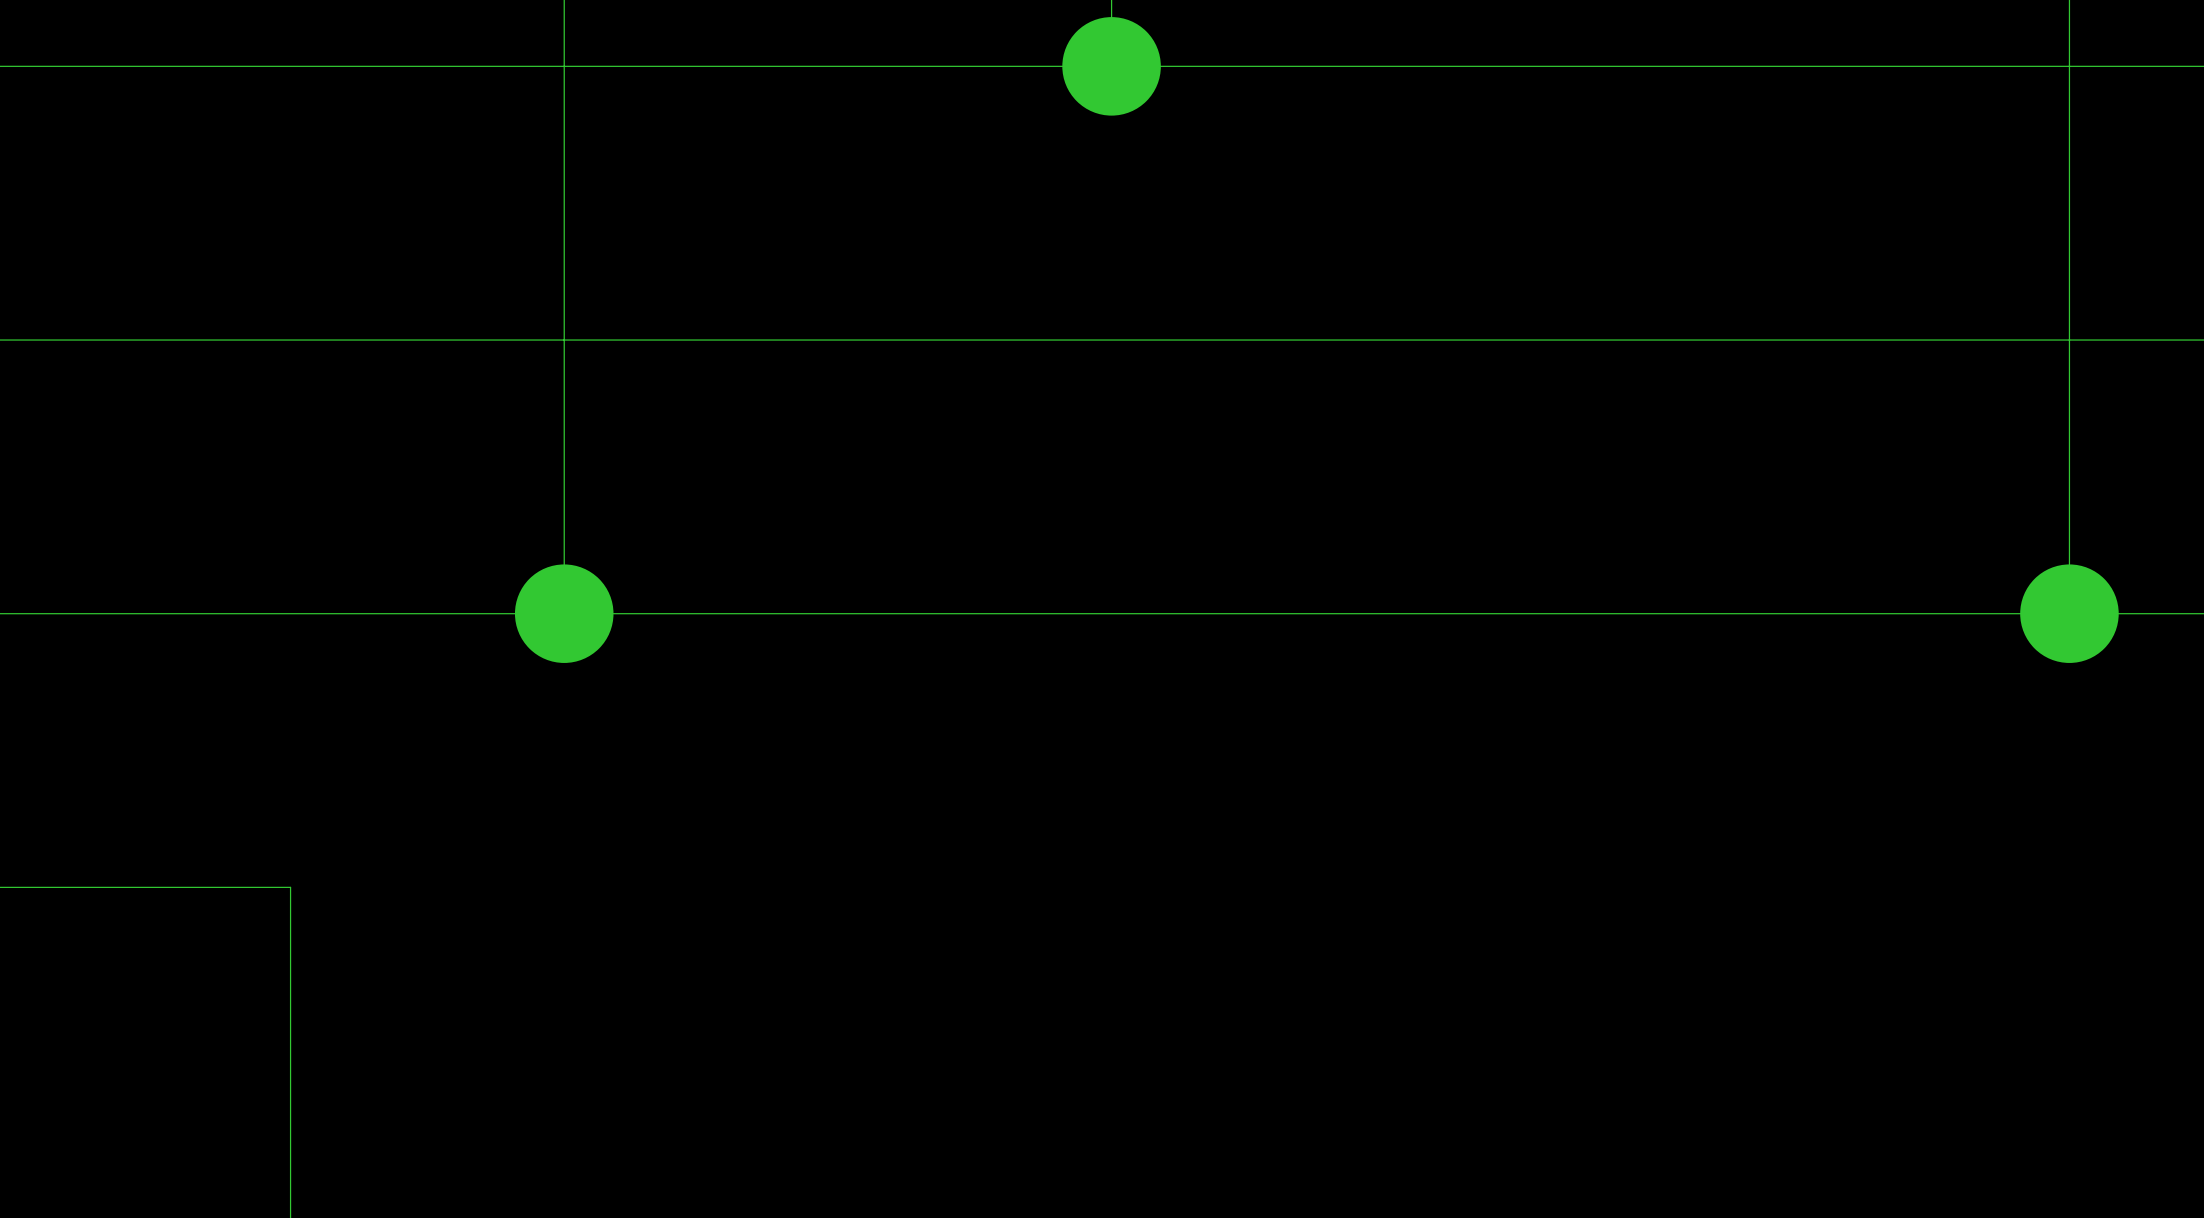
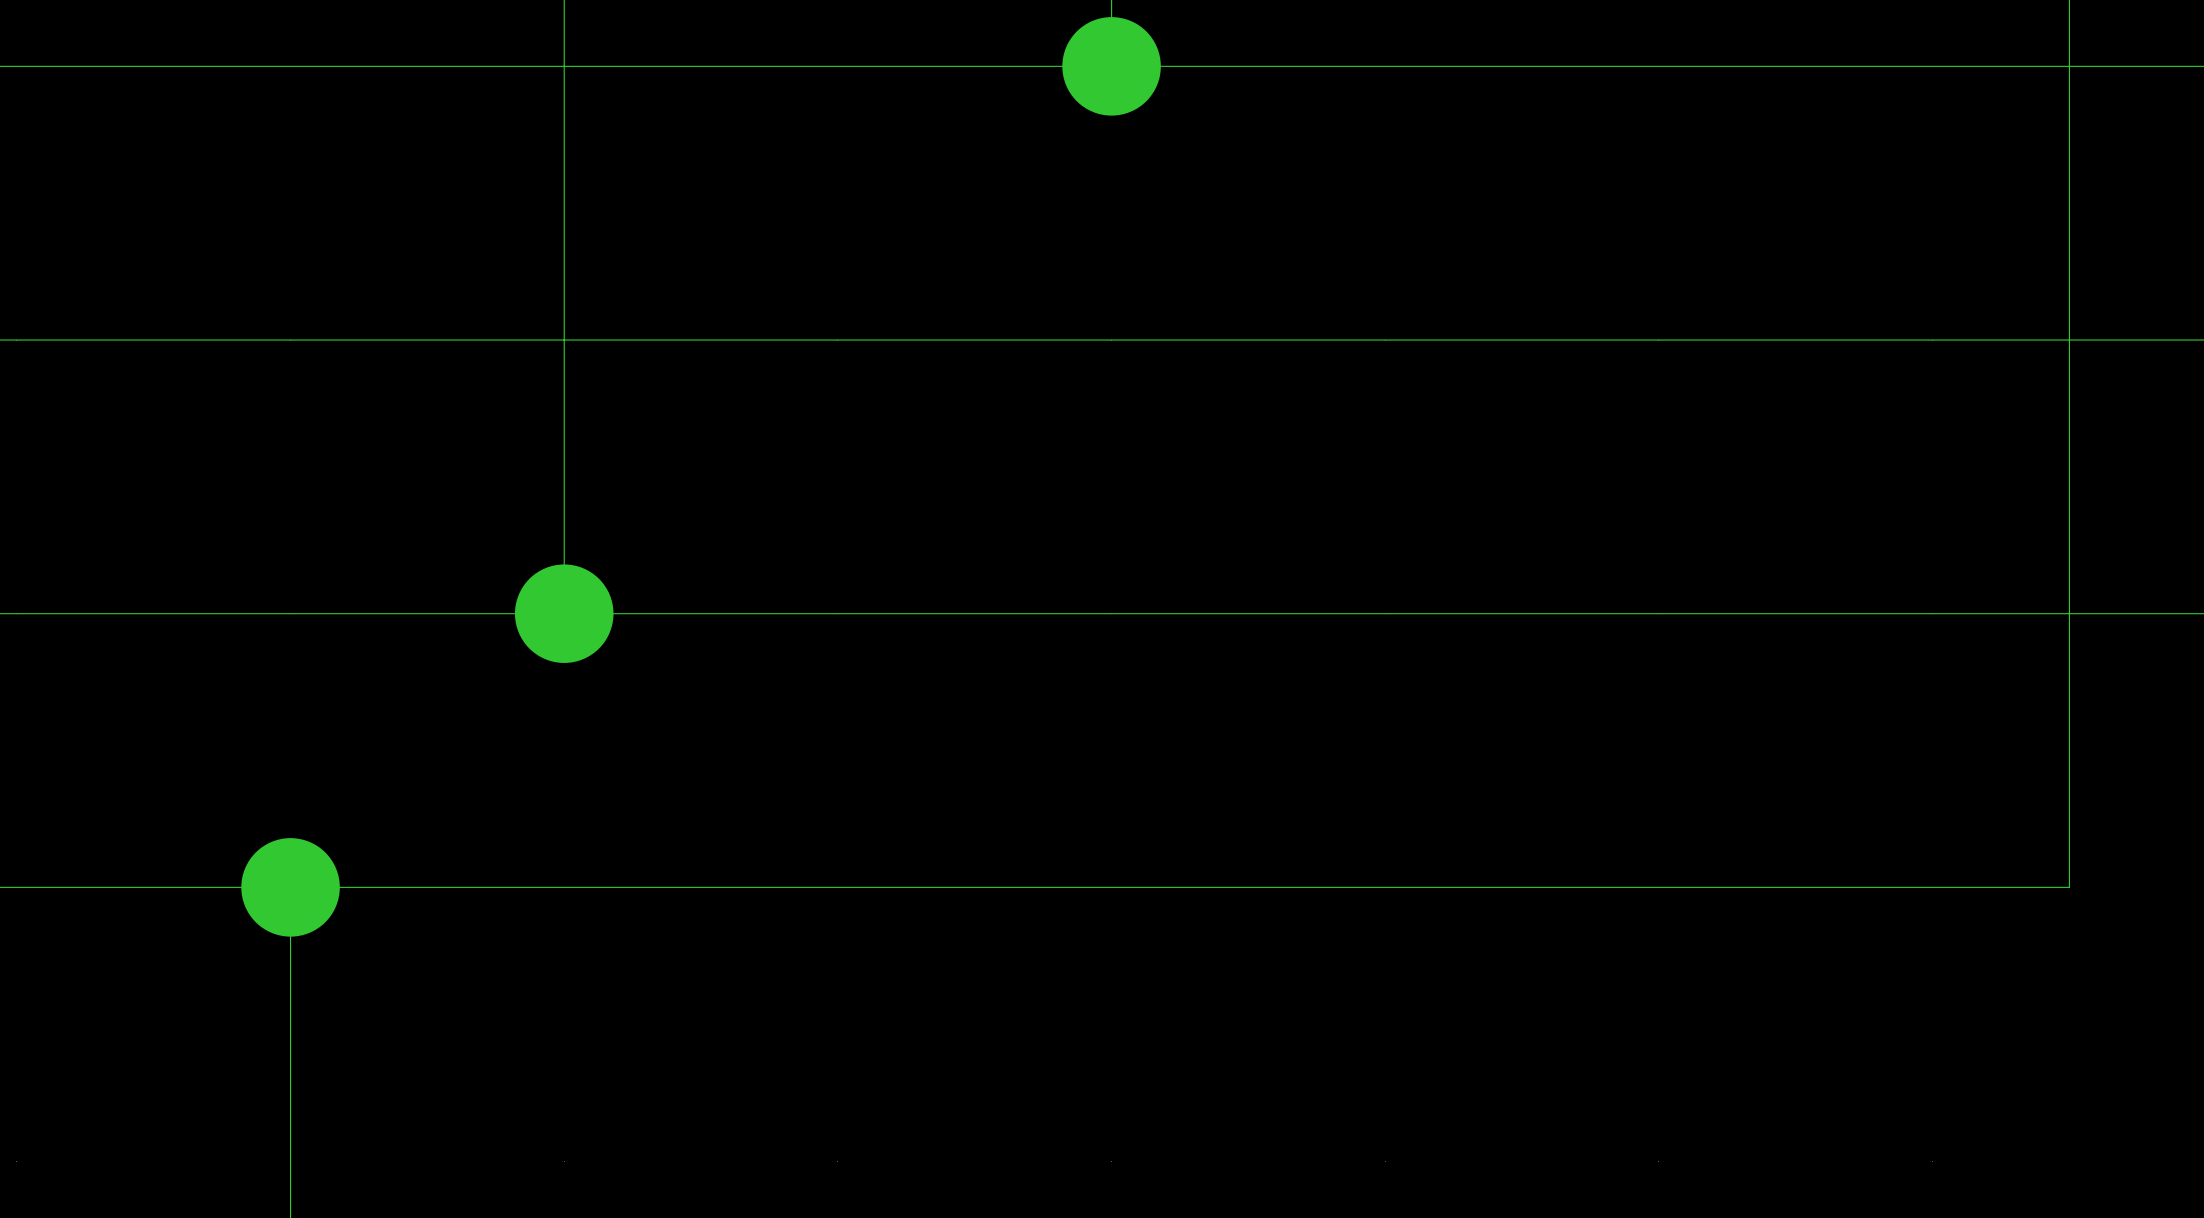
wire: none -> (2069, 613) (2069, 887) (290, 887)
junction: (2069, 613) -> none
junction: none -> (290, 887)

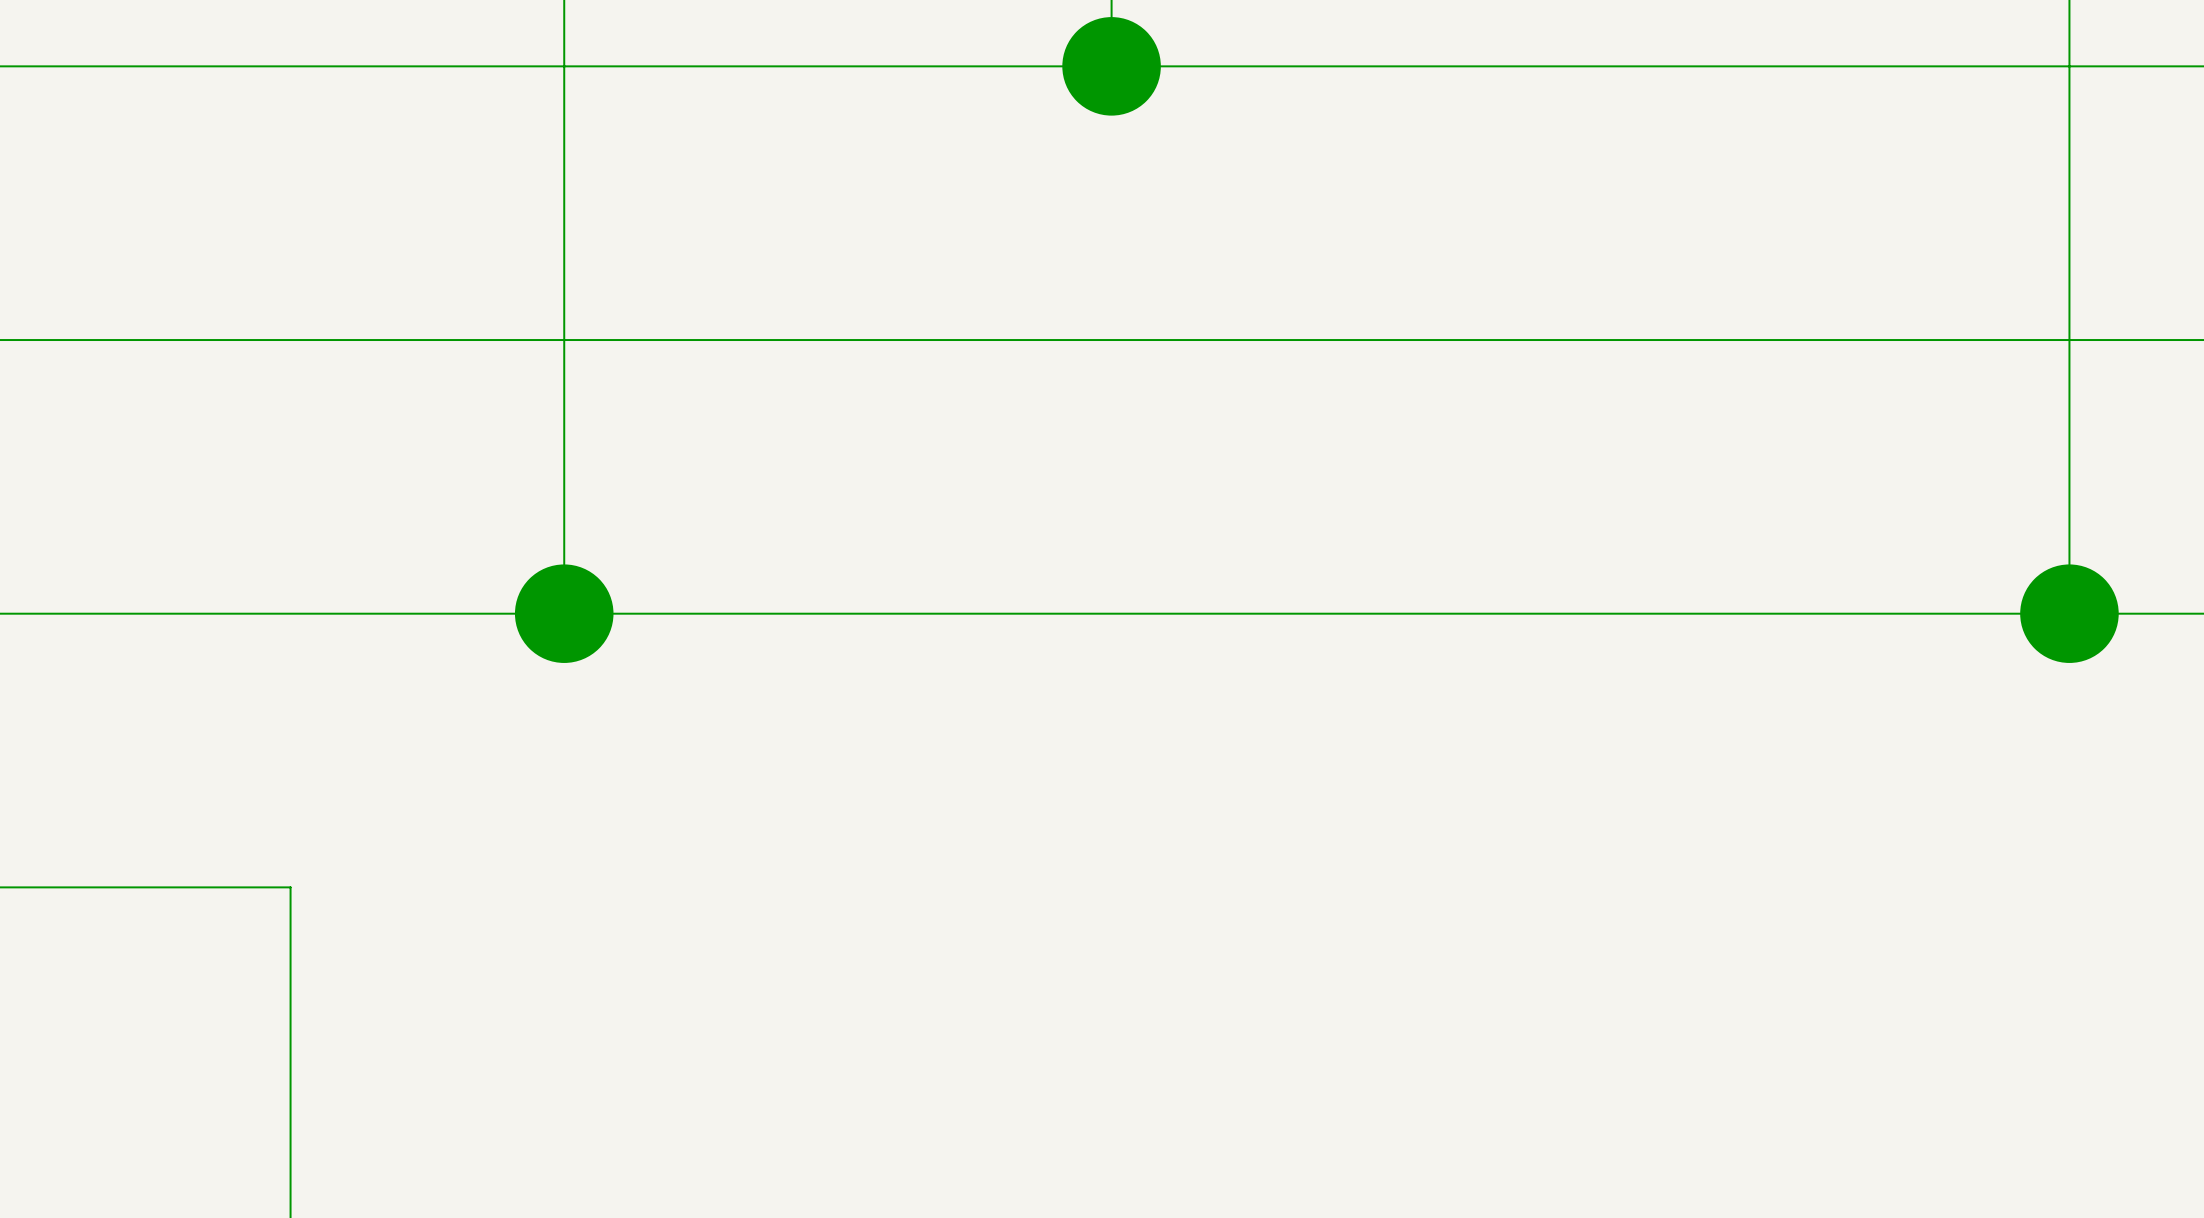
wire: (2069, 613) (2069, 887) (290, 887) -> none
junction: none -> (2069, 613)
junction: (290, 887) -> none

